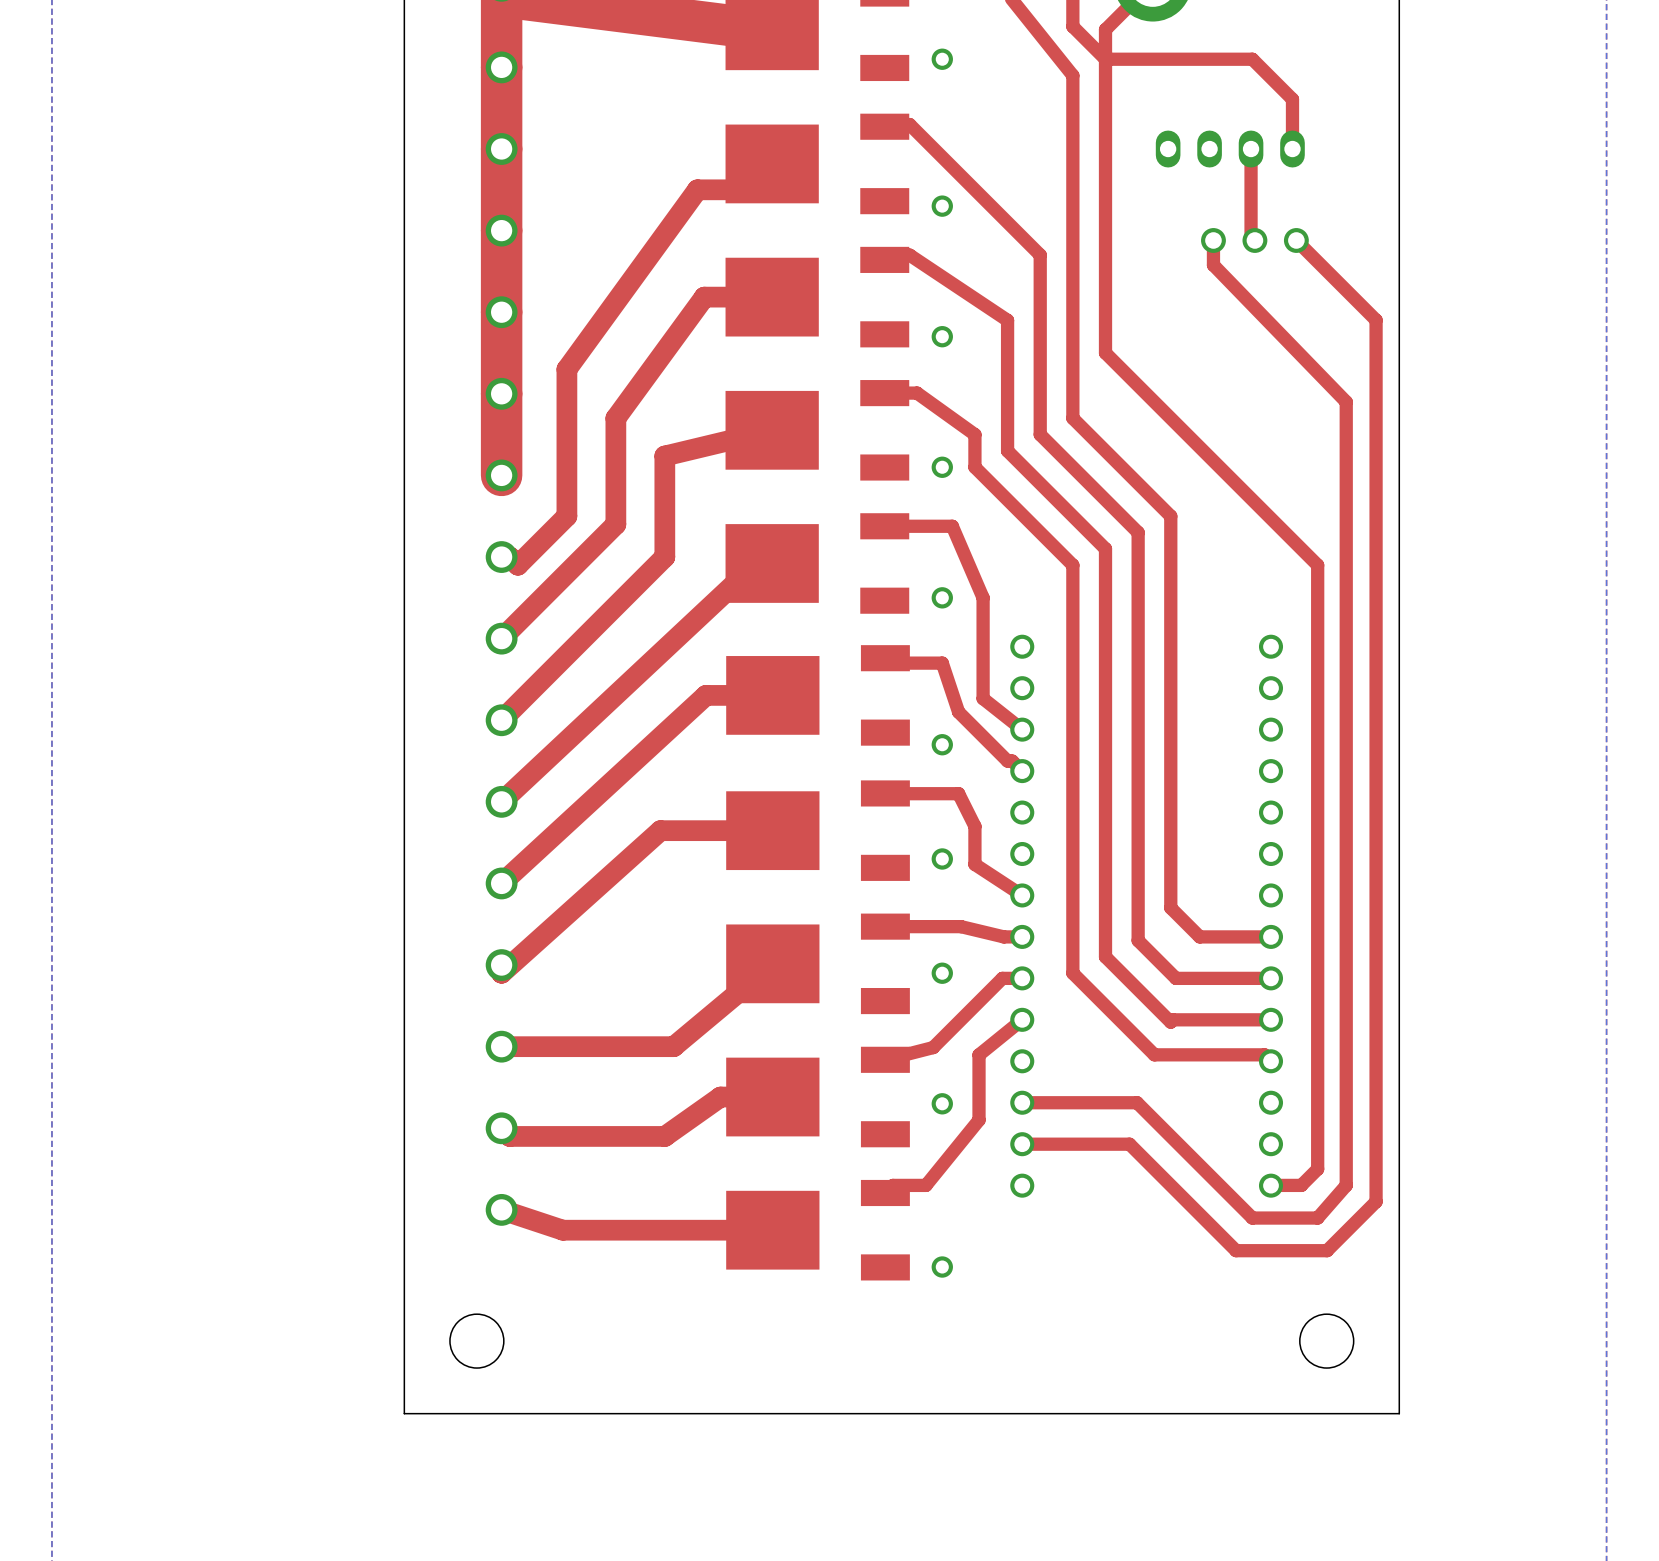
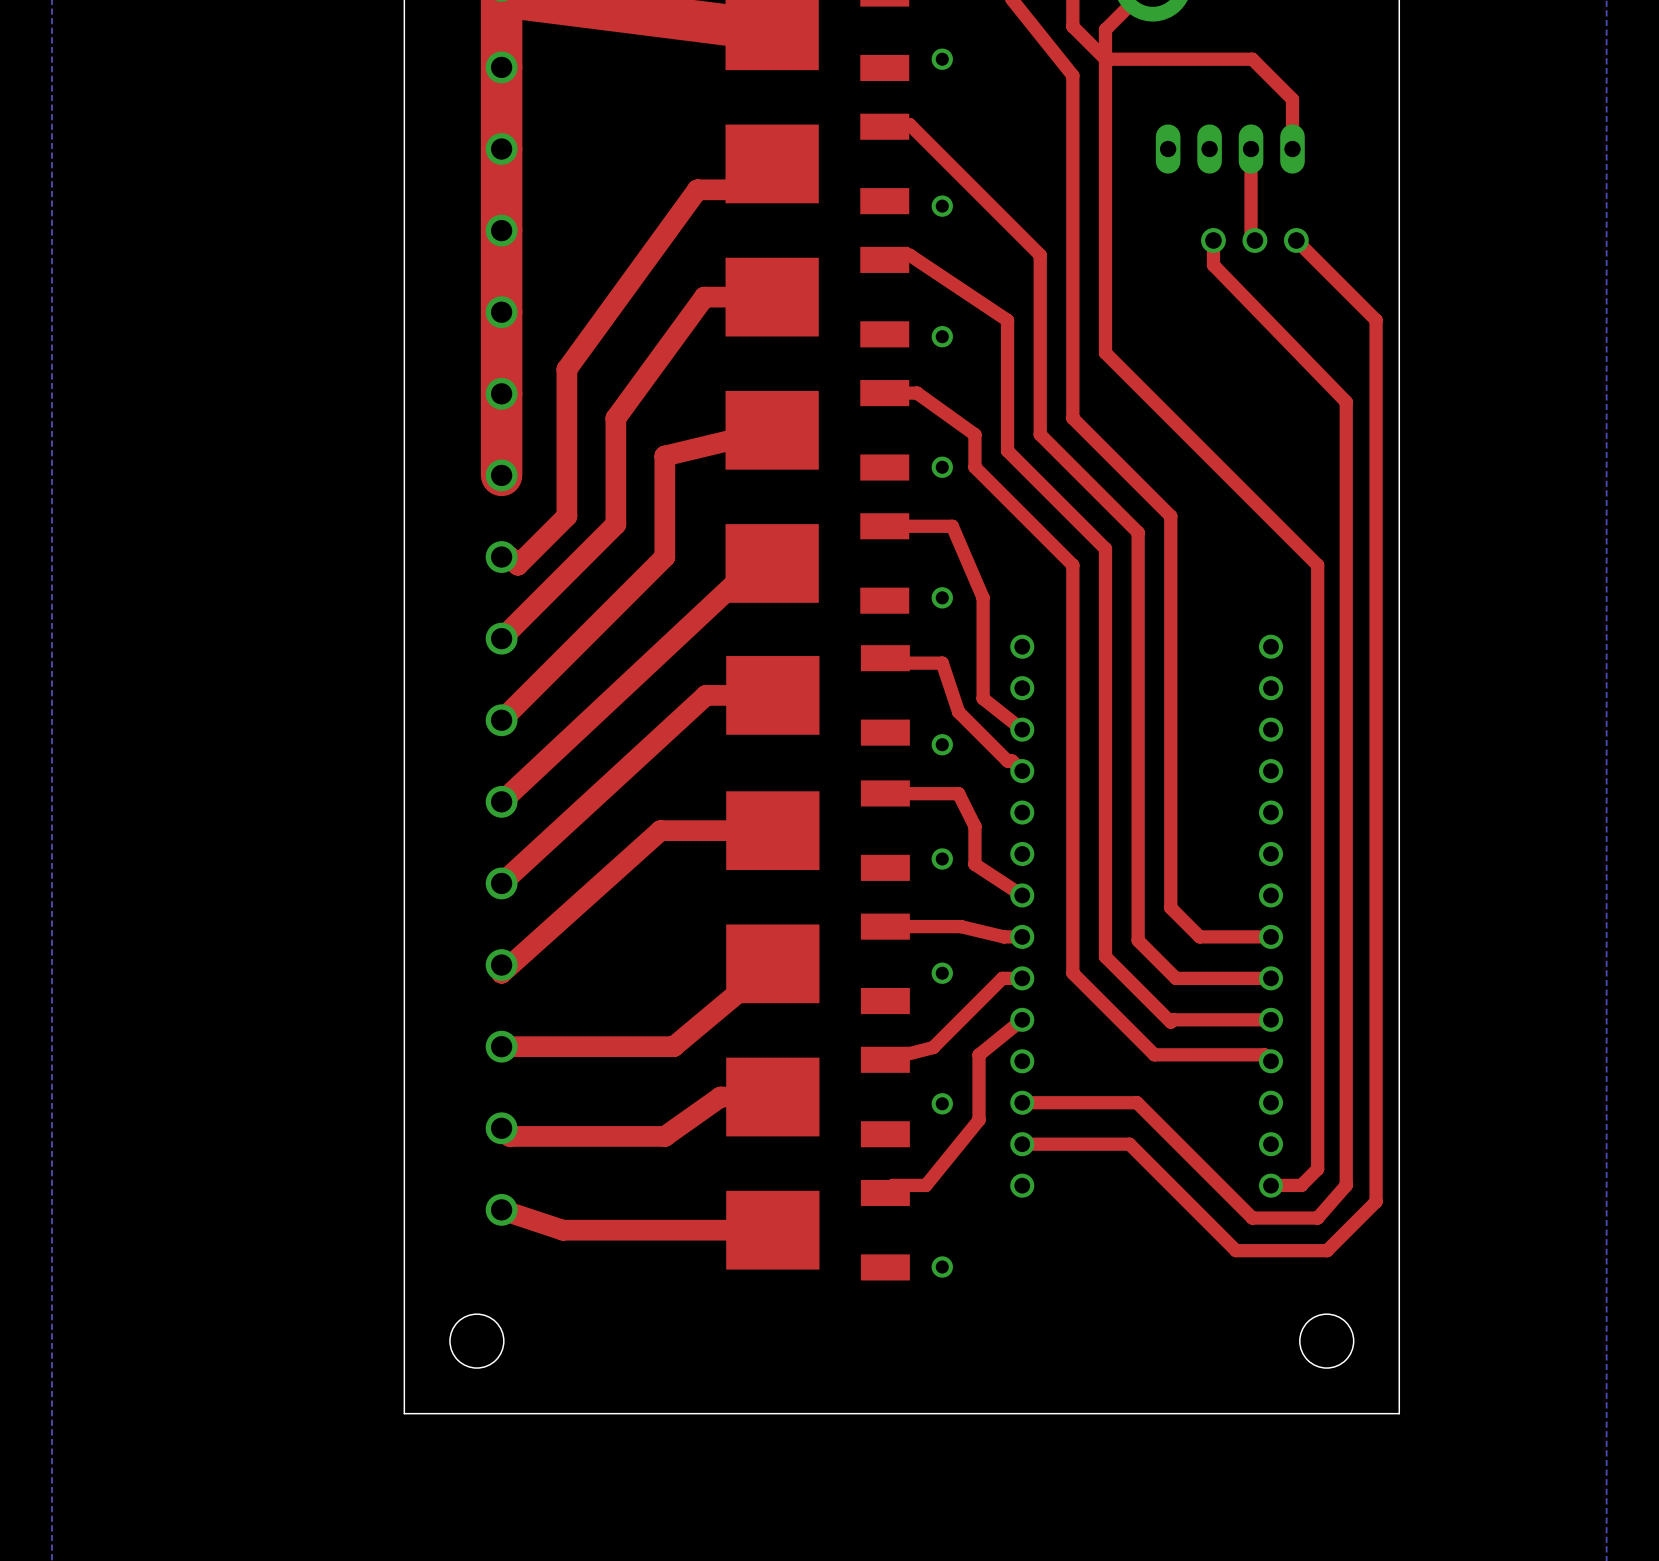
part footprint: [1155, 130, 1305, 168] -> [1155, 124, 1305, 174]

